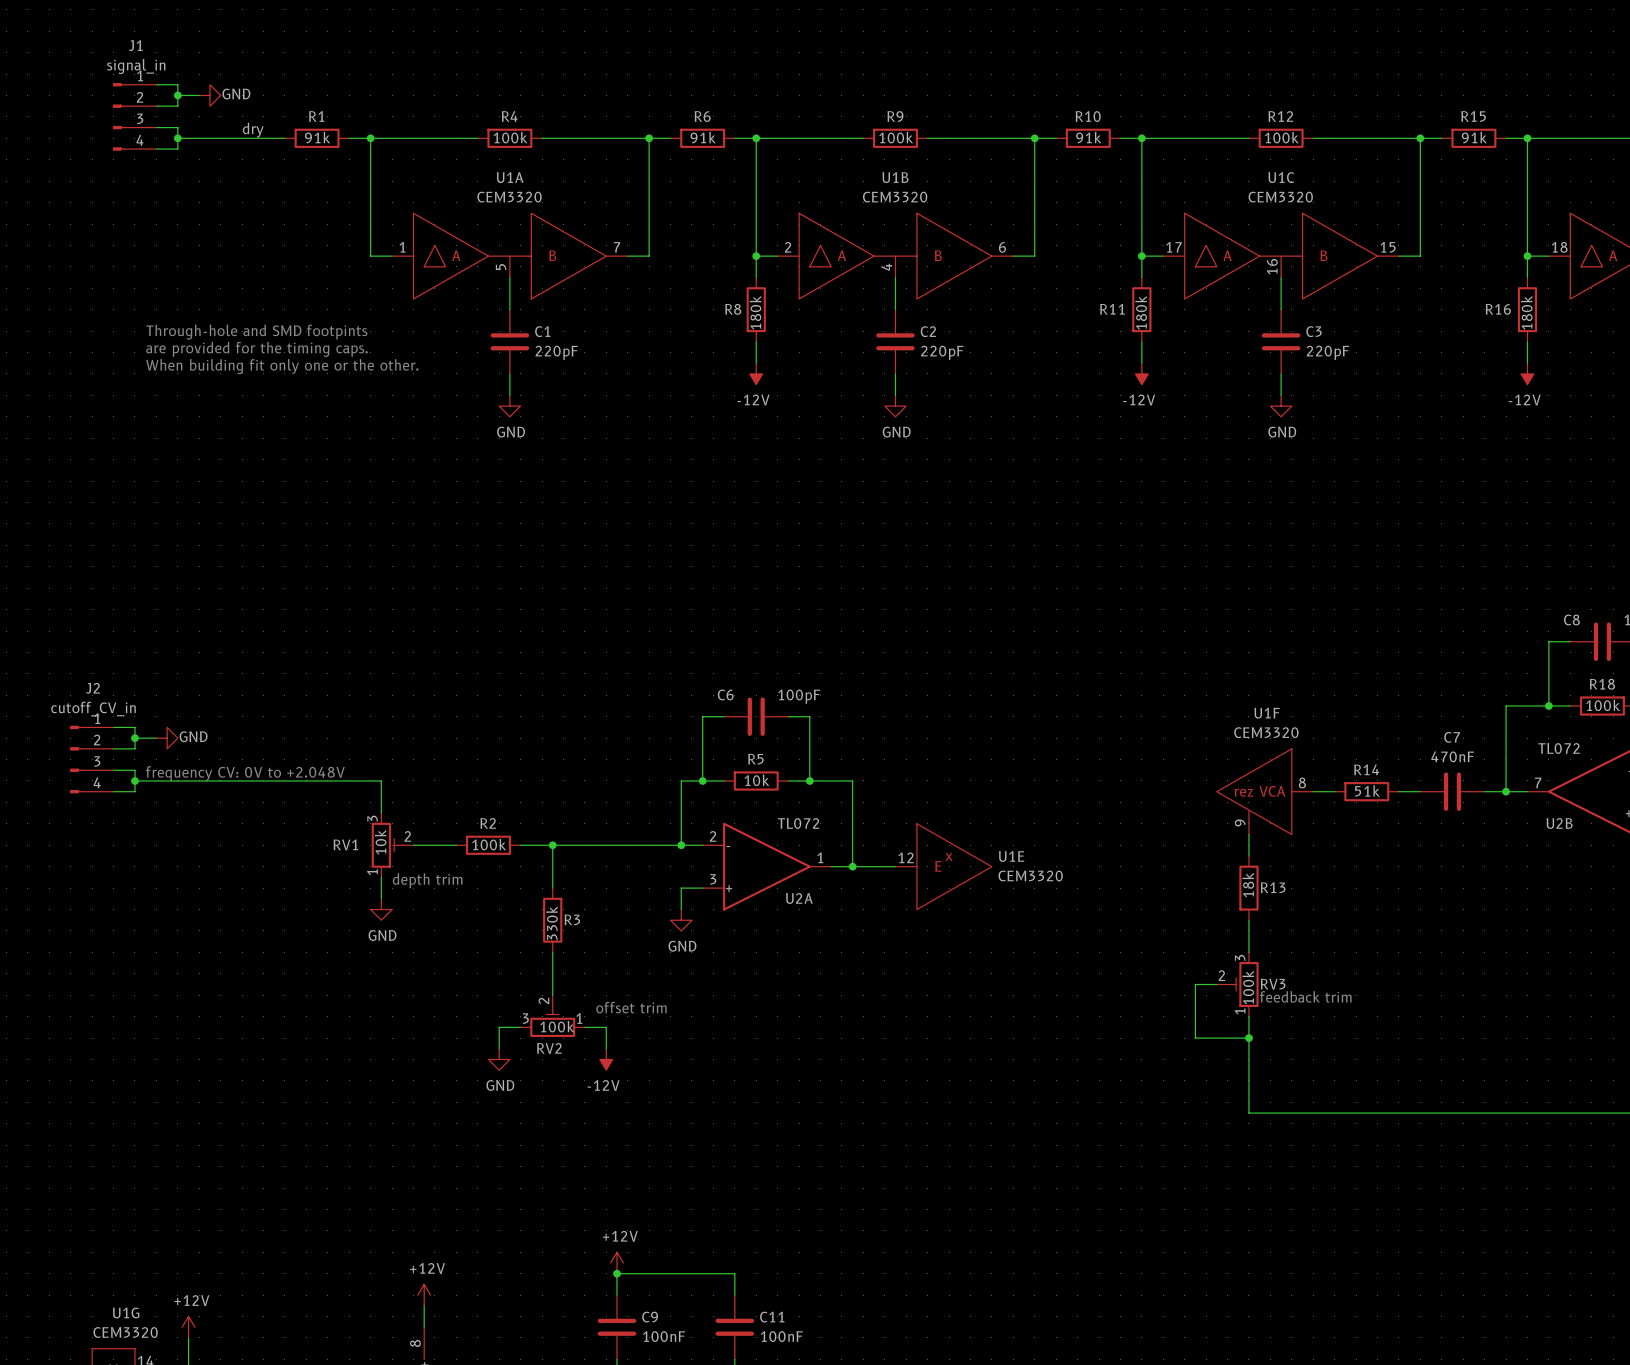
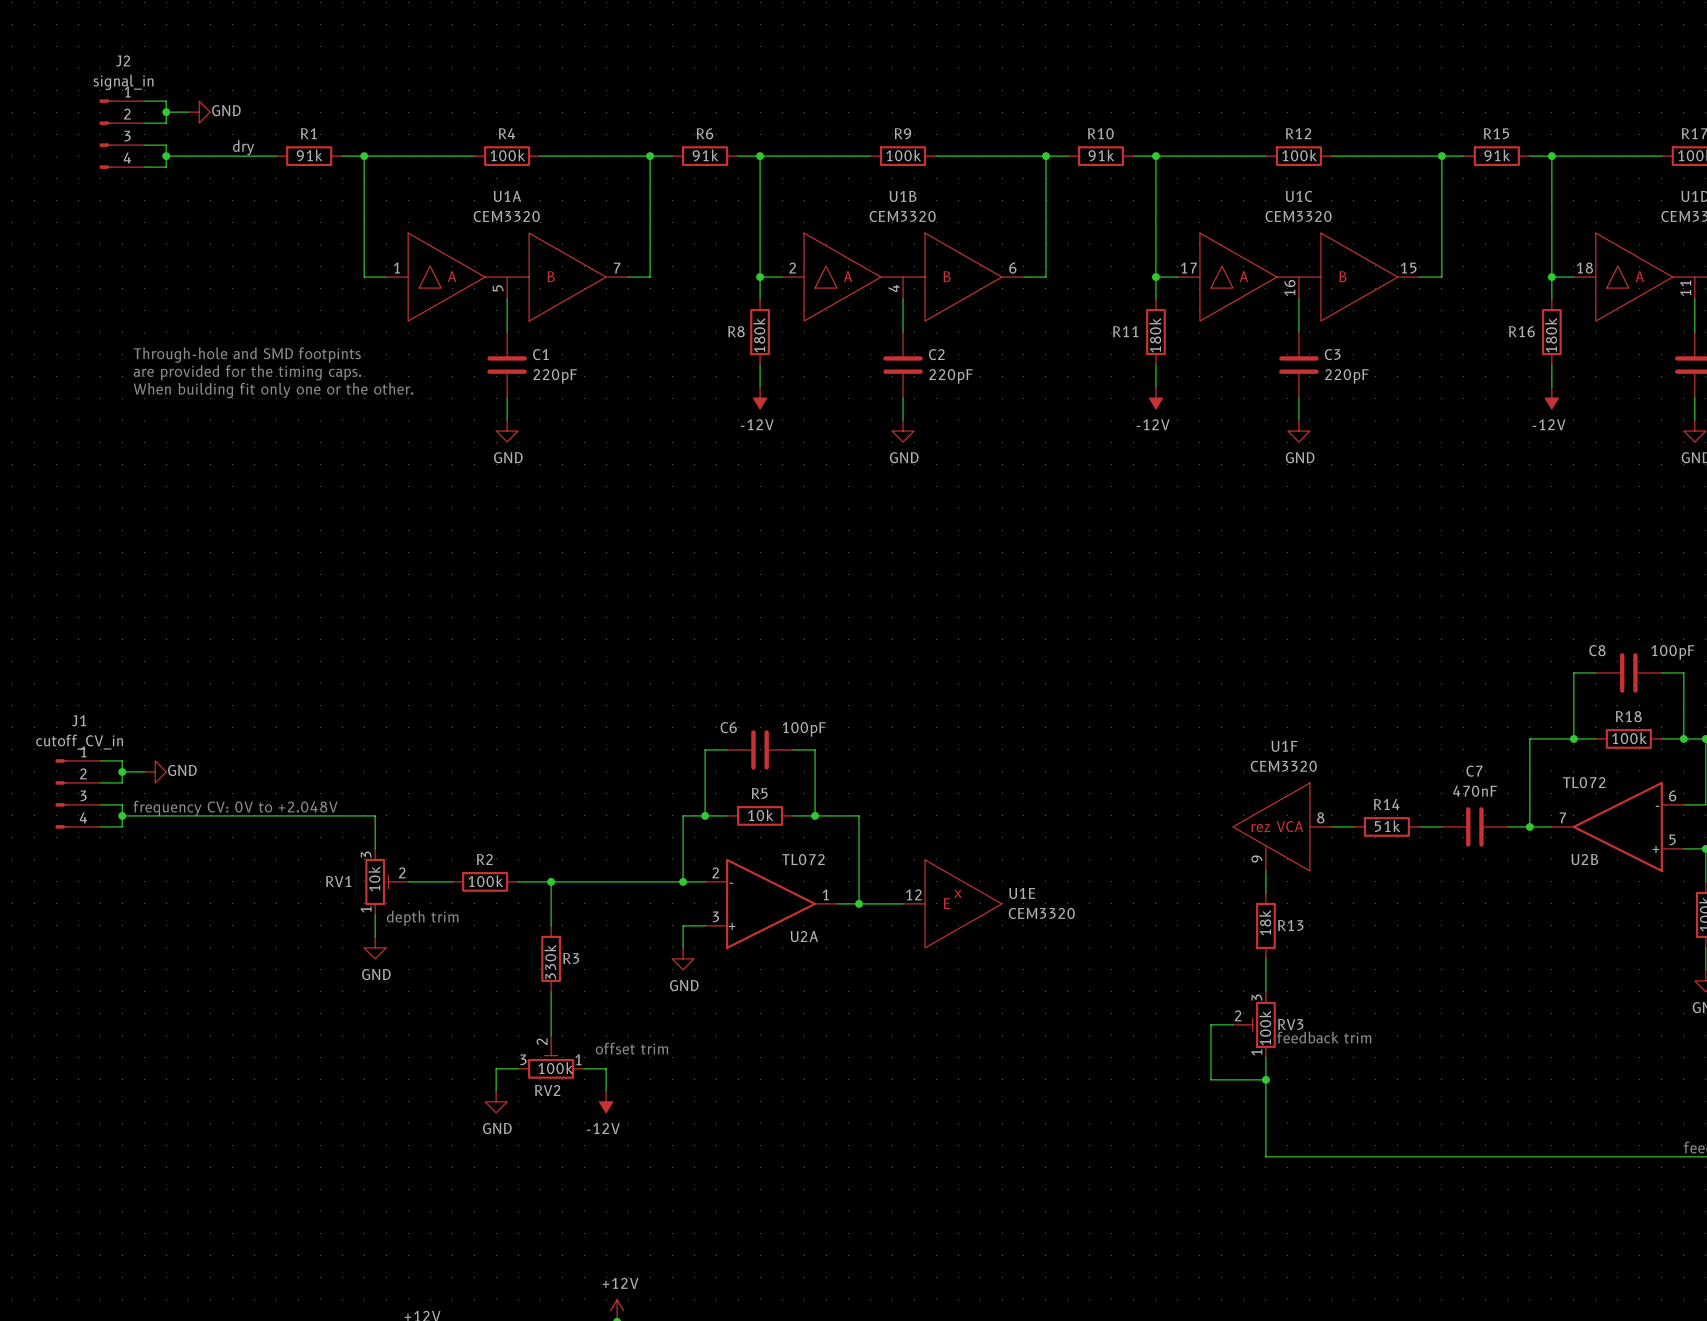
J1 name: J1 (135, 45) -> J2 (123, 60)
J2 name: J2 (92, 688) -> J1 (79, 720)

